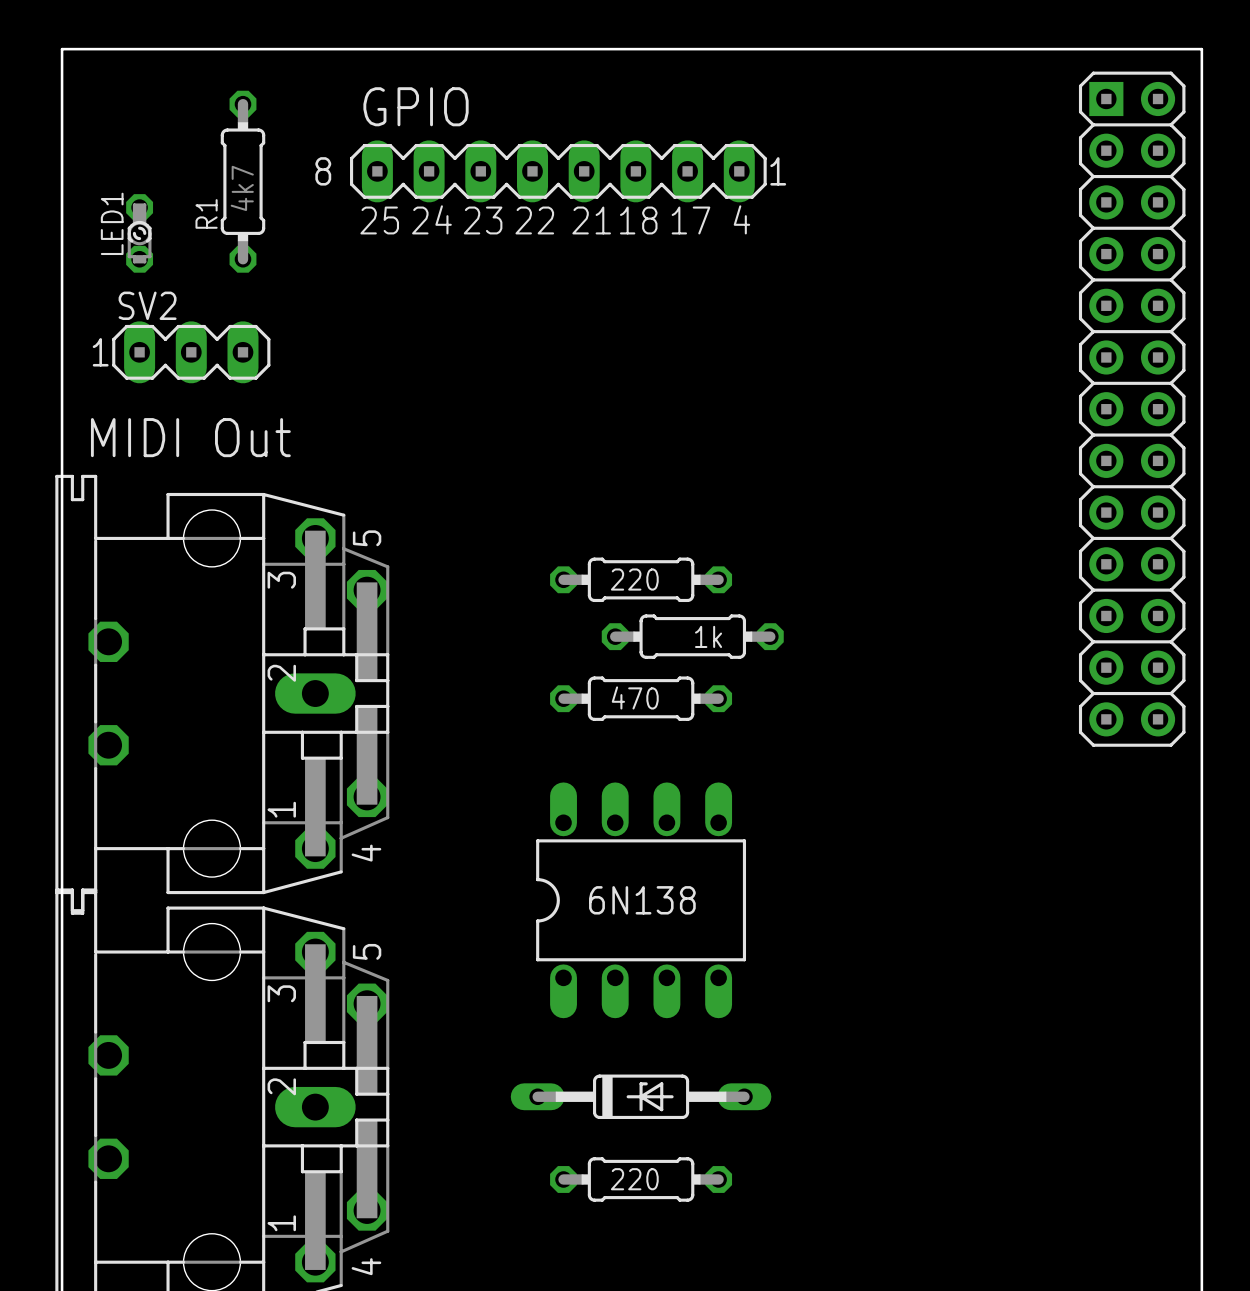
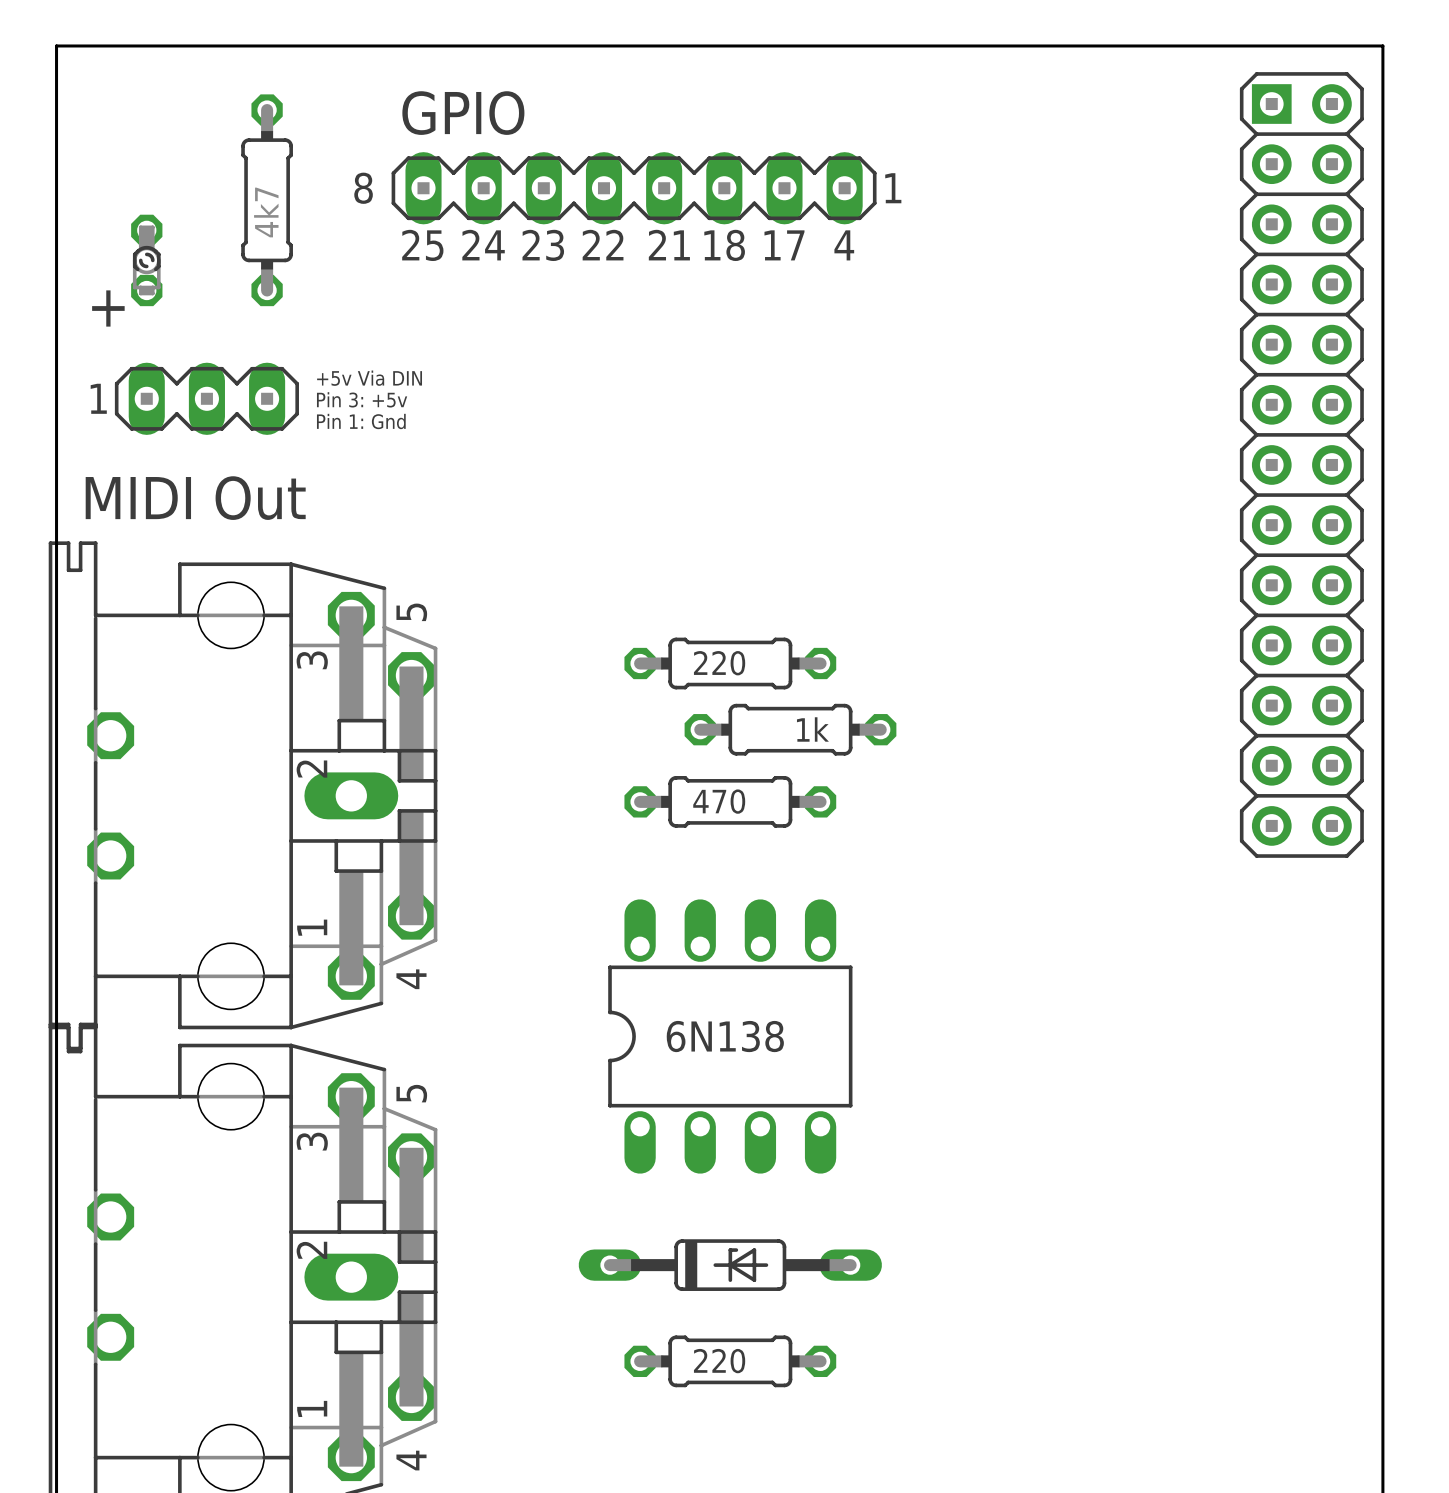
R1 name: R1 (206, 213) -> none
LED1 name: LED1 (112, 223) -> none
text: none -> + (108, 308)
SV2 name: SV2 (147, 305) -> none
text: none -> +5v Via DIN (369, 378)
text: none -> Pin 3: +5v (362, 399)
text: none -> Pin 1: Gnd (361, 421)

